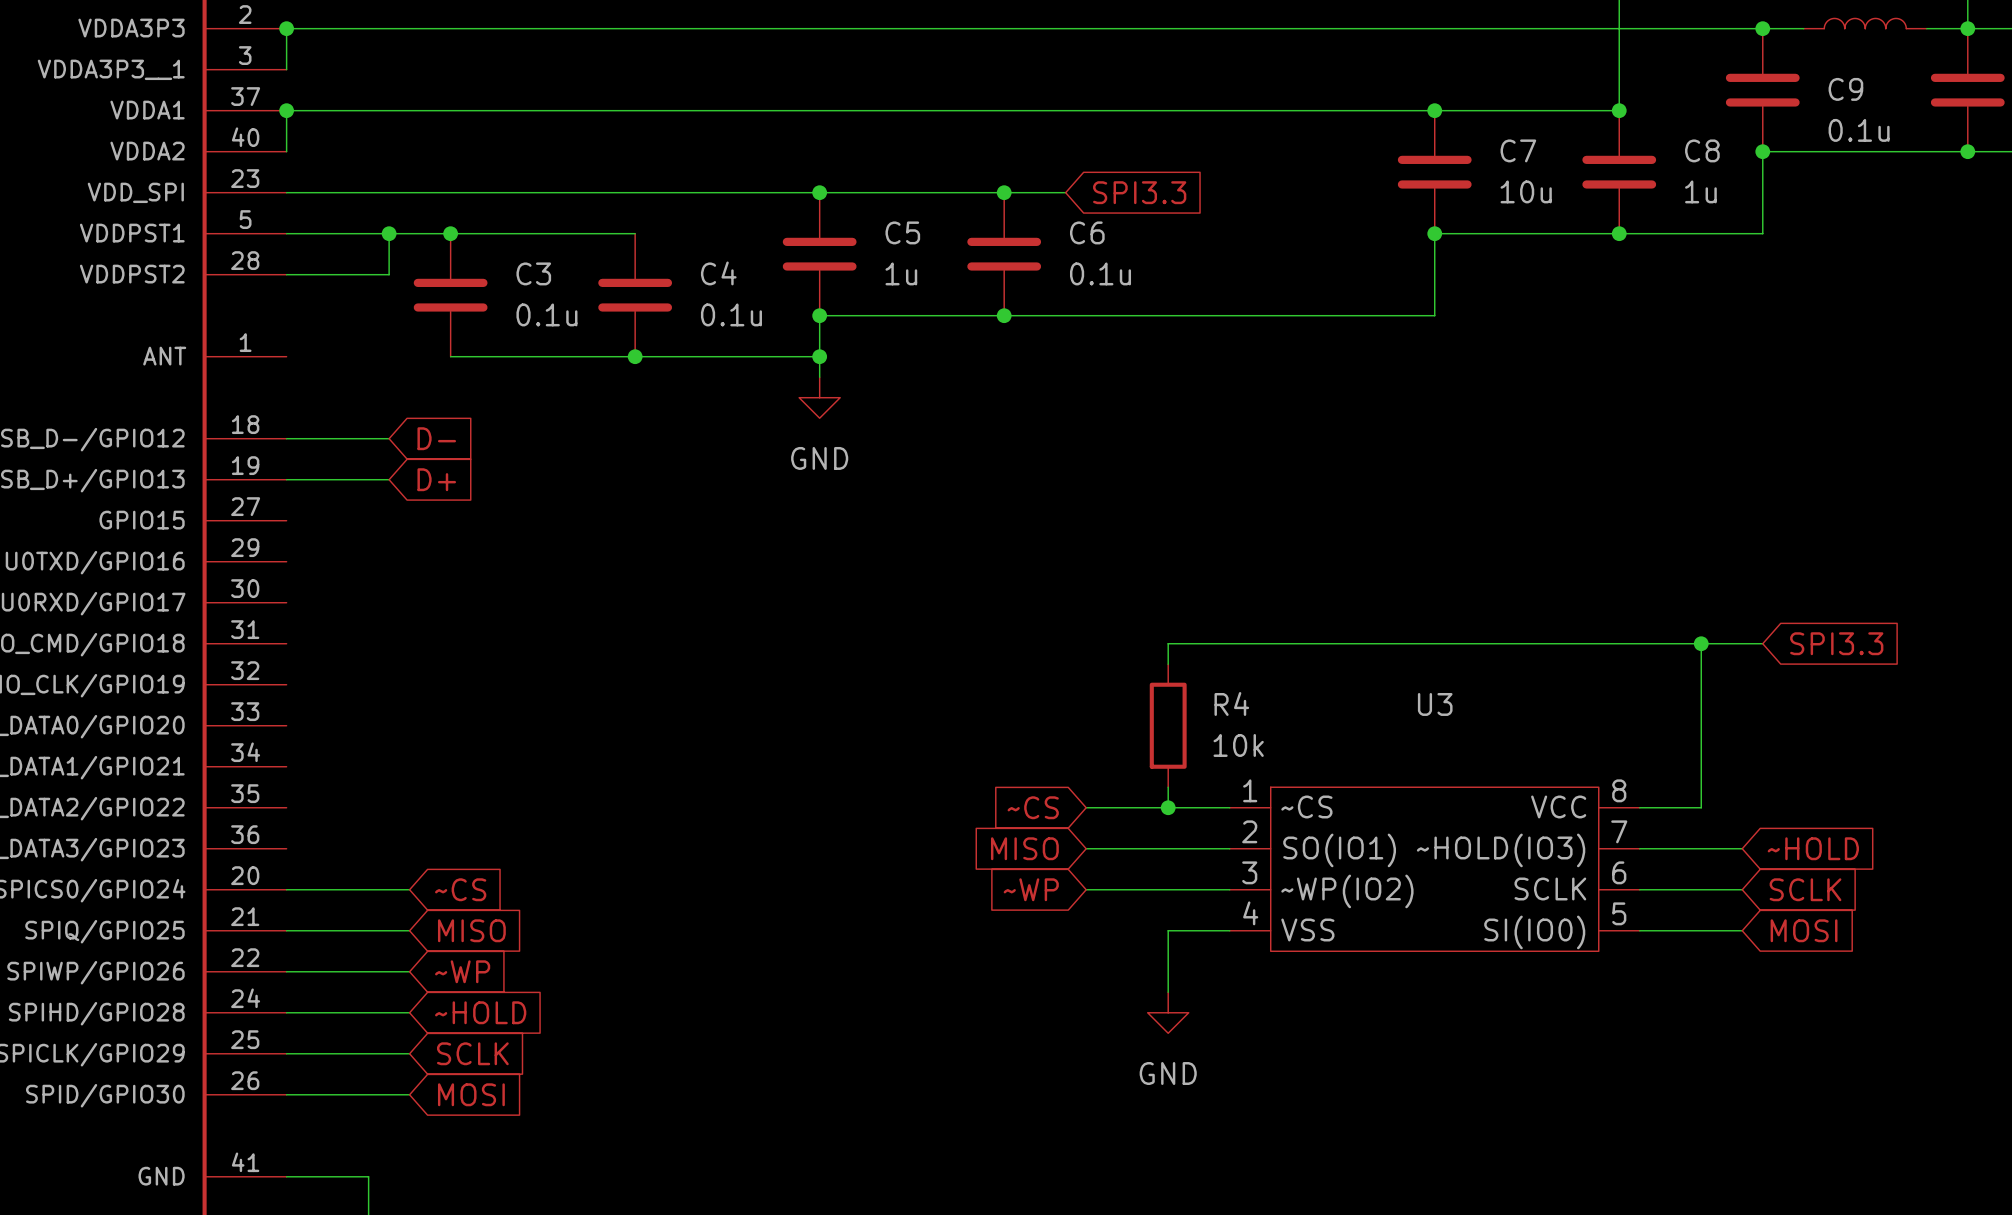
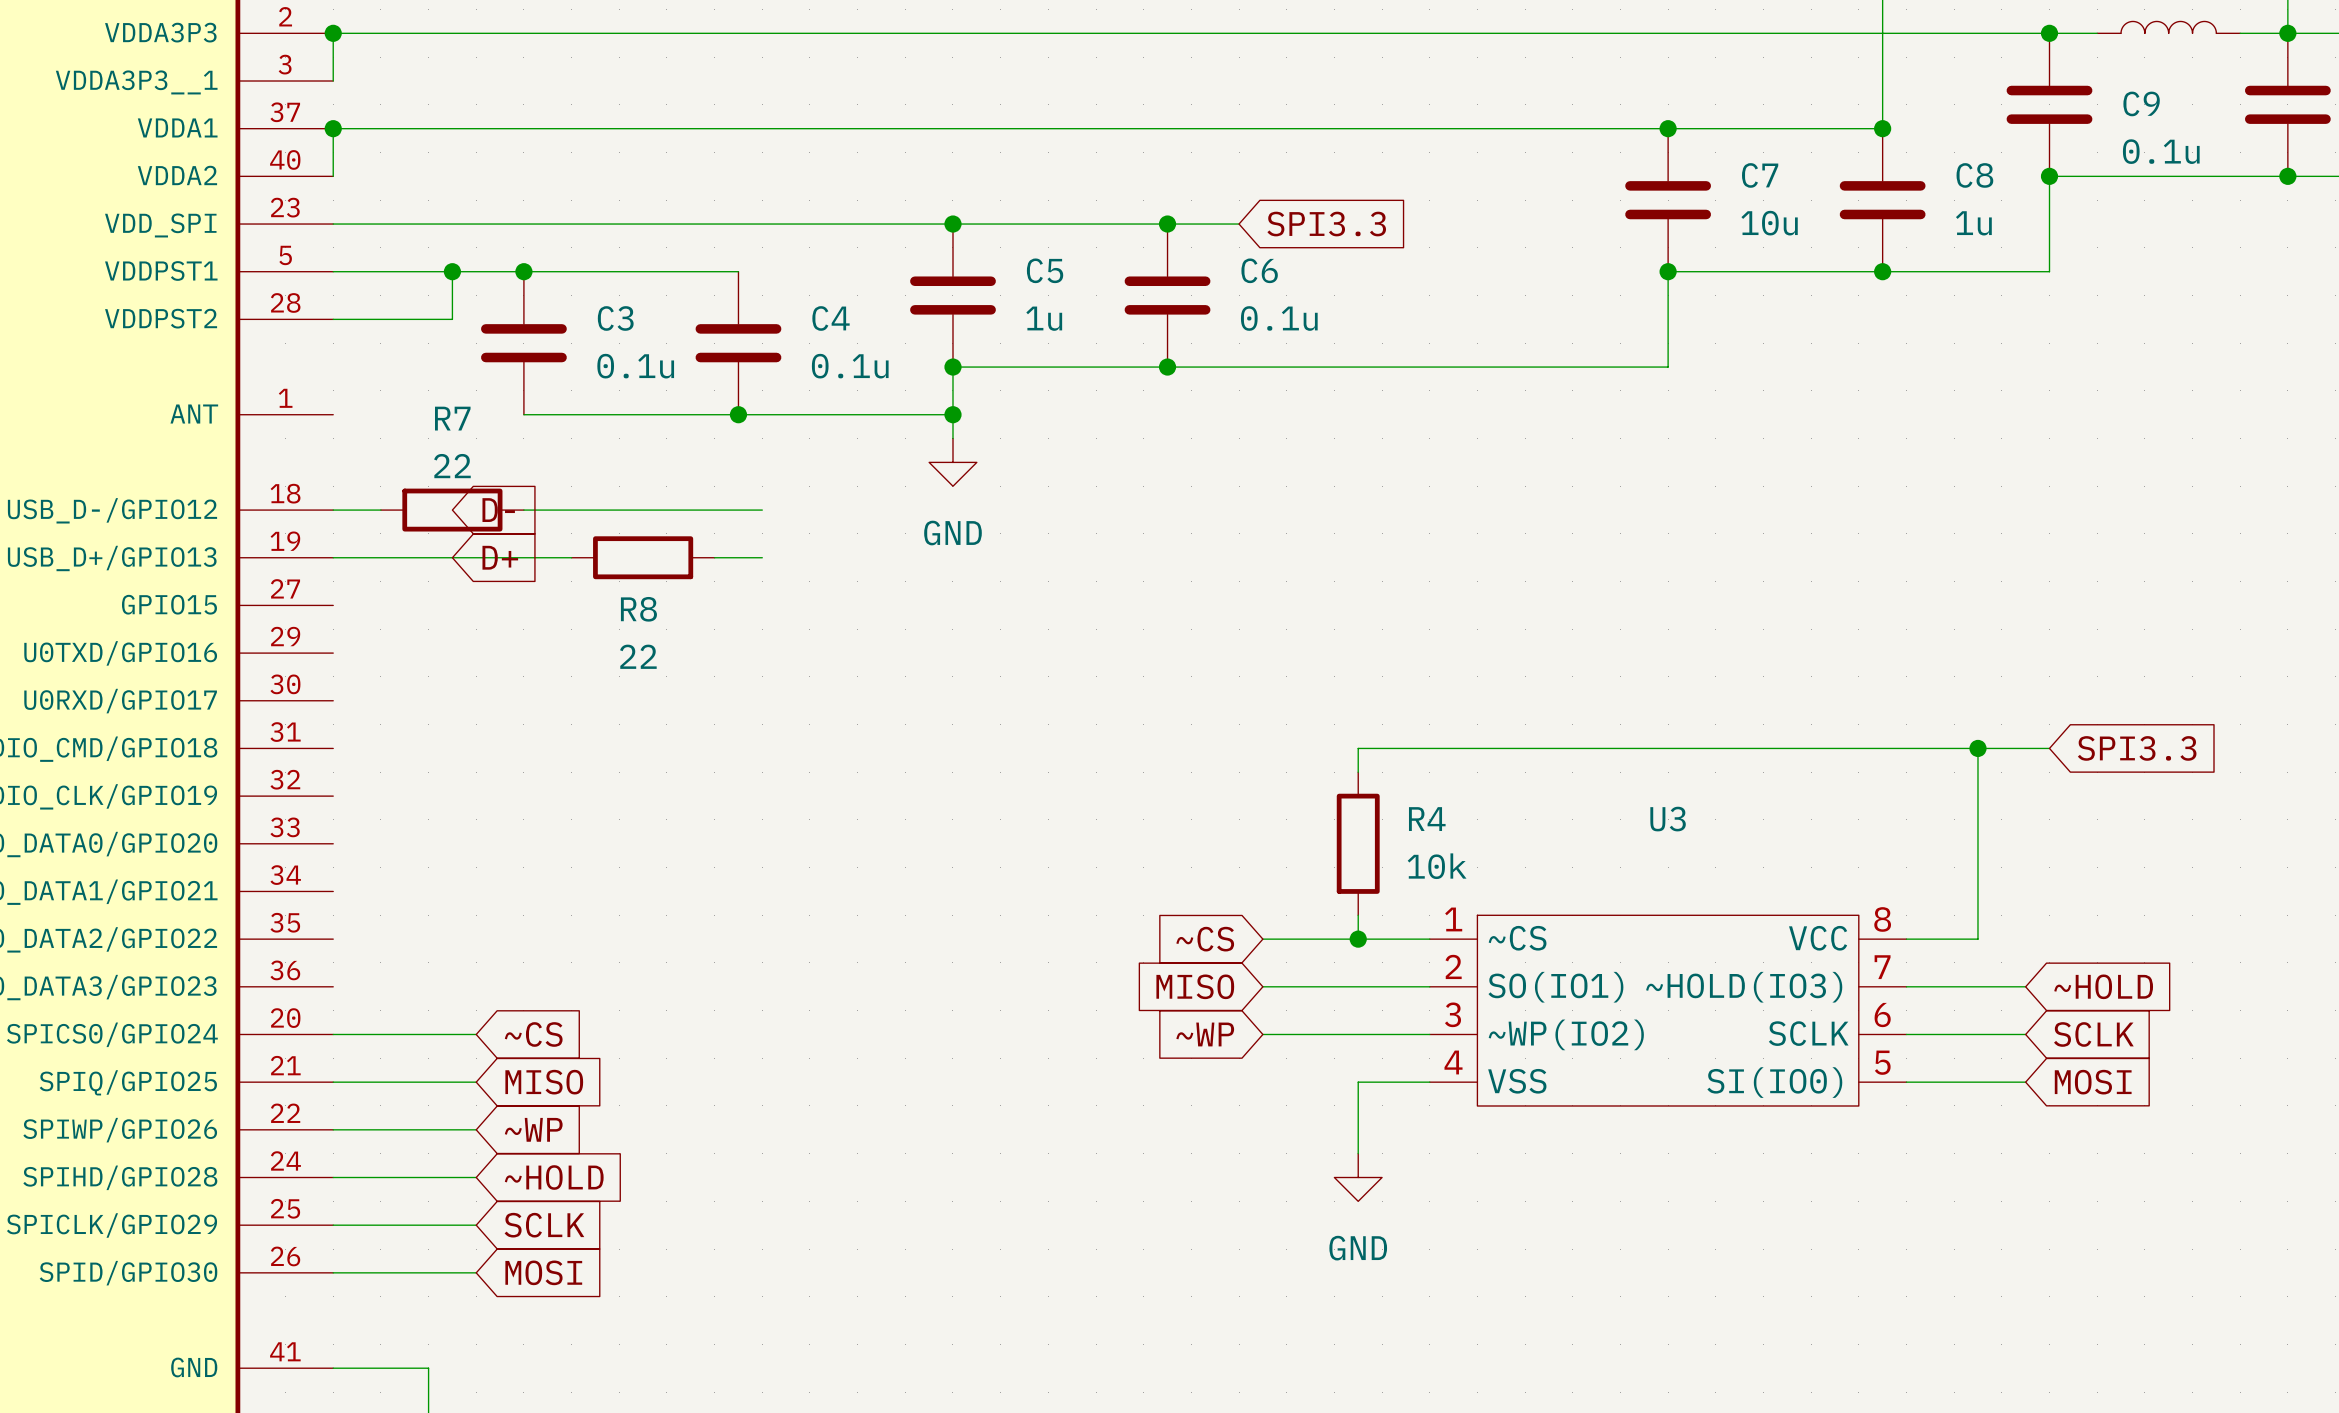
wire: (327, 438) (389, 438) -> none
R7: none -> 22 (452, 510)
wire: none -> (523, 510) (762, 510)
wire: none -> (452, 557) (571, 557)
R8: none -> 22 (643, 557)
wire: none -> (714, 557) (762, 557)

